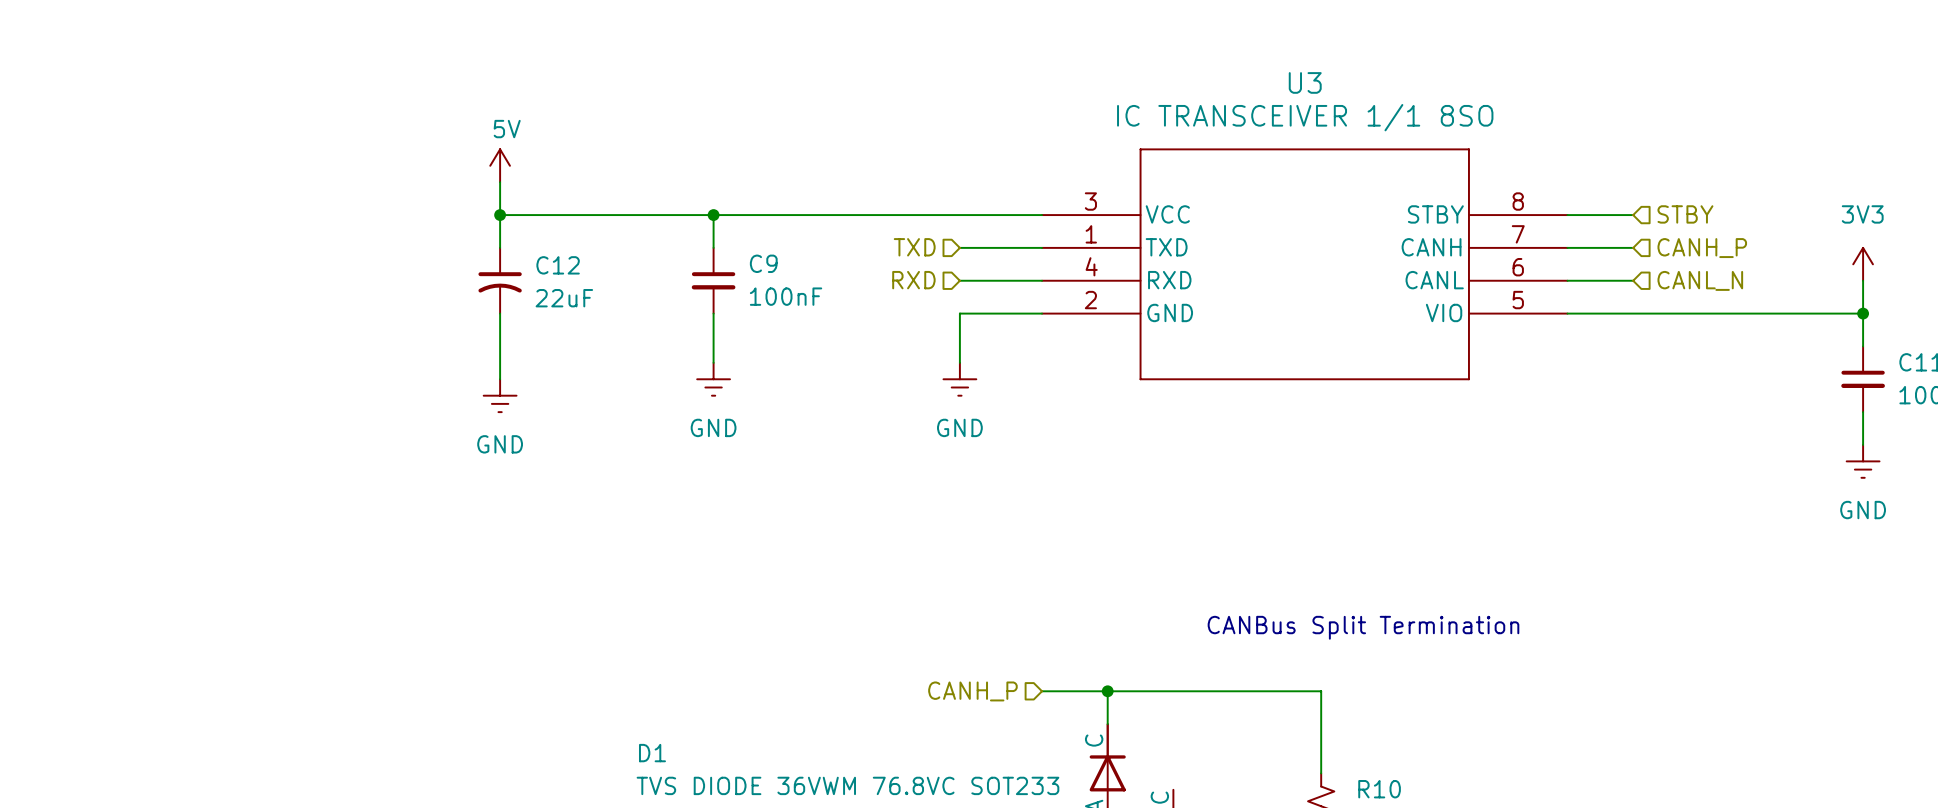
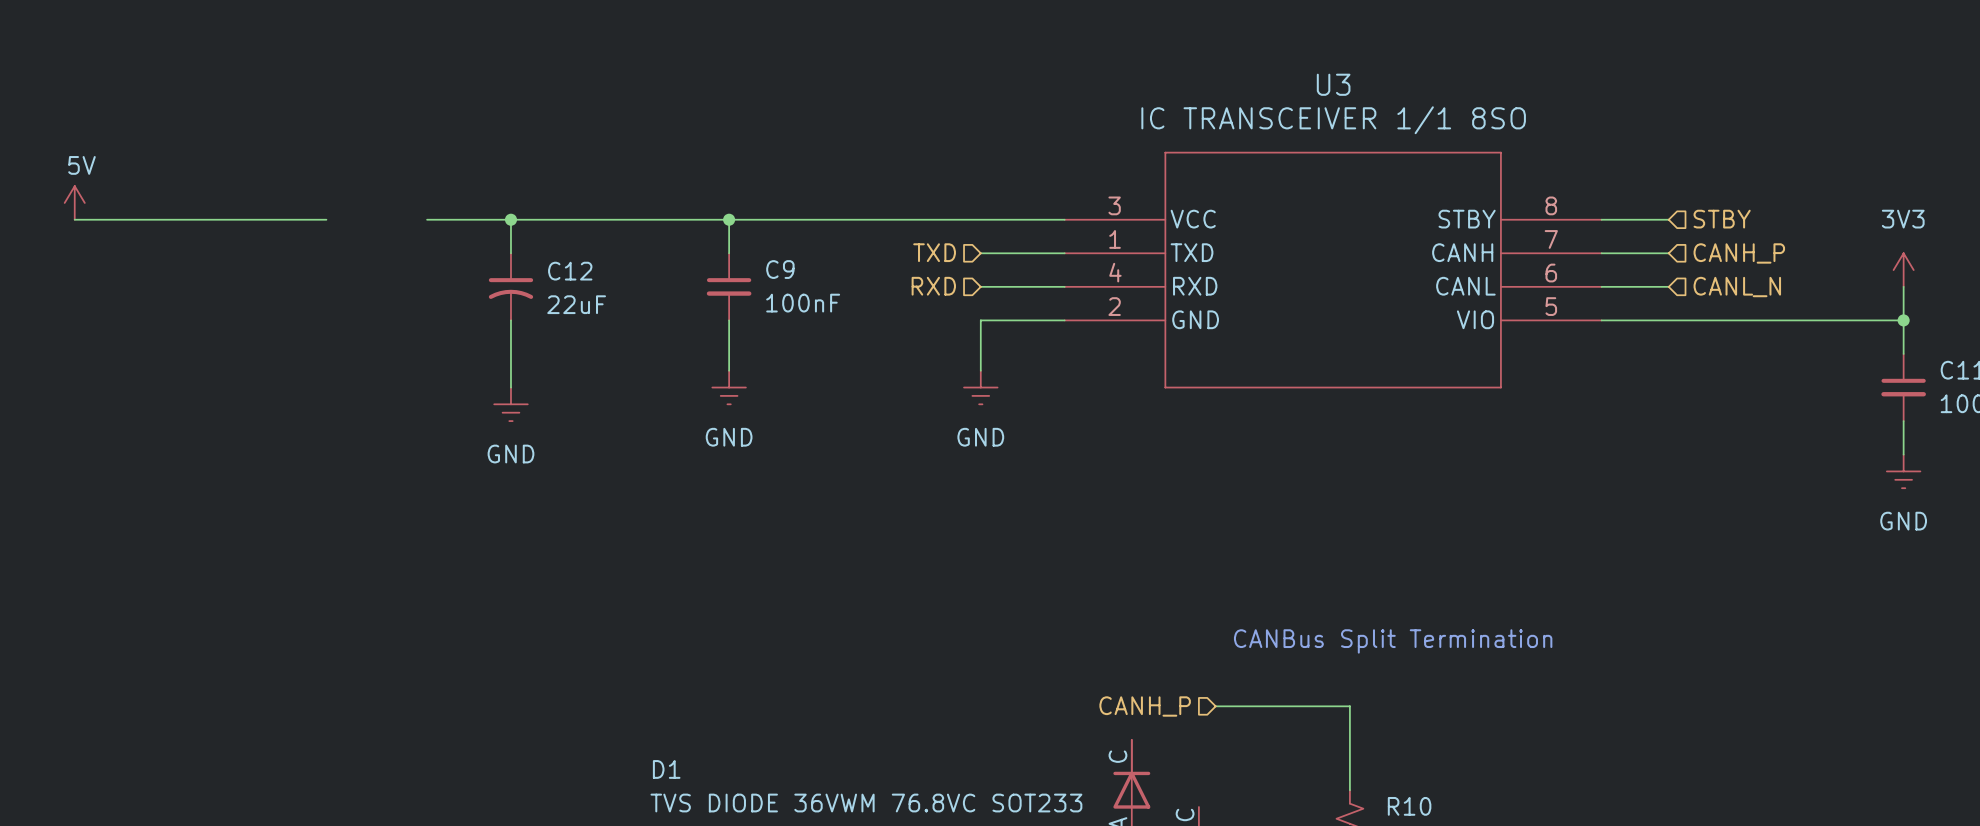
power symbol: 5V (500, 165) -> none
wire: (500, 182) (500, 215) -> (427, 219) (510, 219)
power symbol: none -> 5V (74, 202)
wire: none -> (74, 219) (326, 219)
hierarchical label position: CANH_P (972, 691) -> CANH_P (1145, 706)
wire: (1042, 691) (1189, 691) -> none
wire: (1107, 691) (1107, 724) -> none
junction: (1107, 691) -> none

